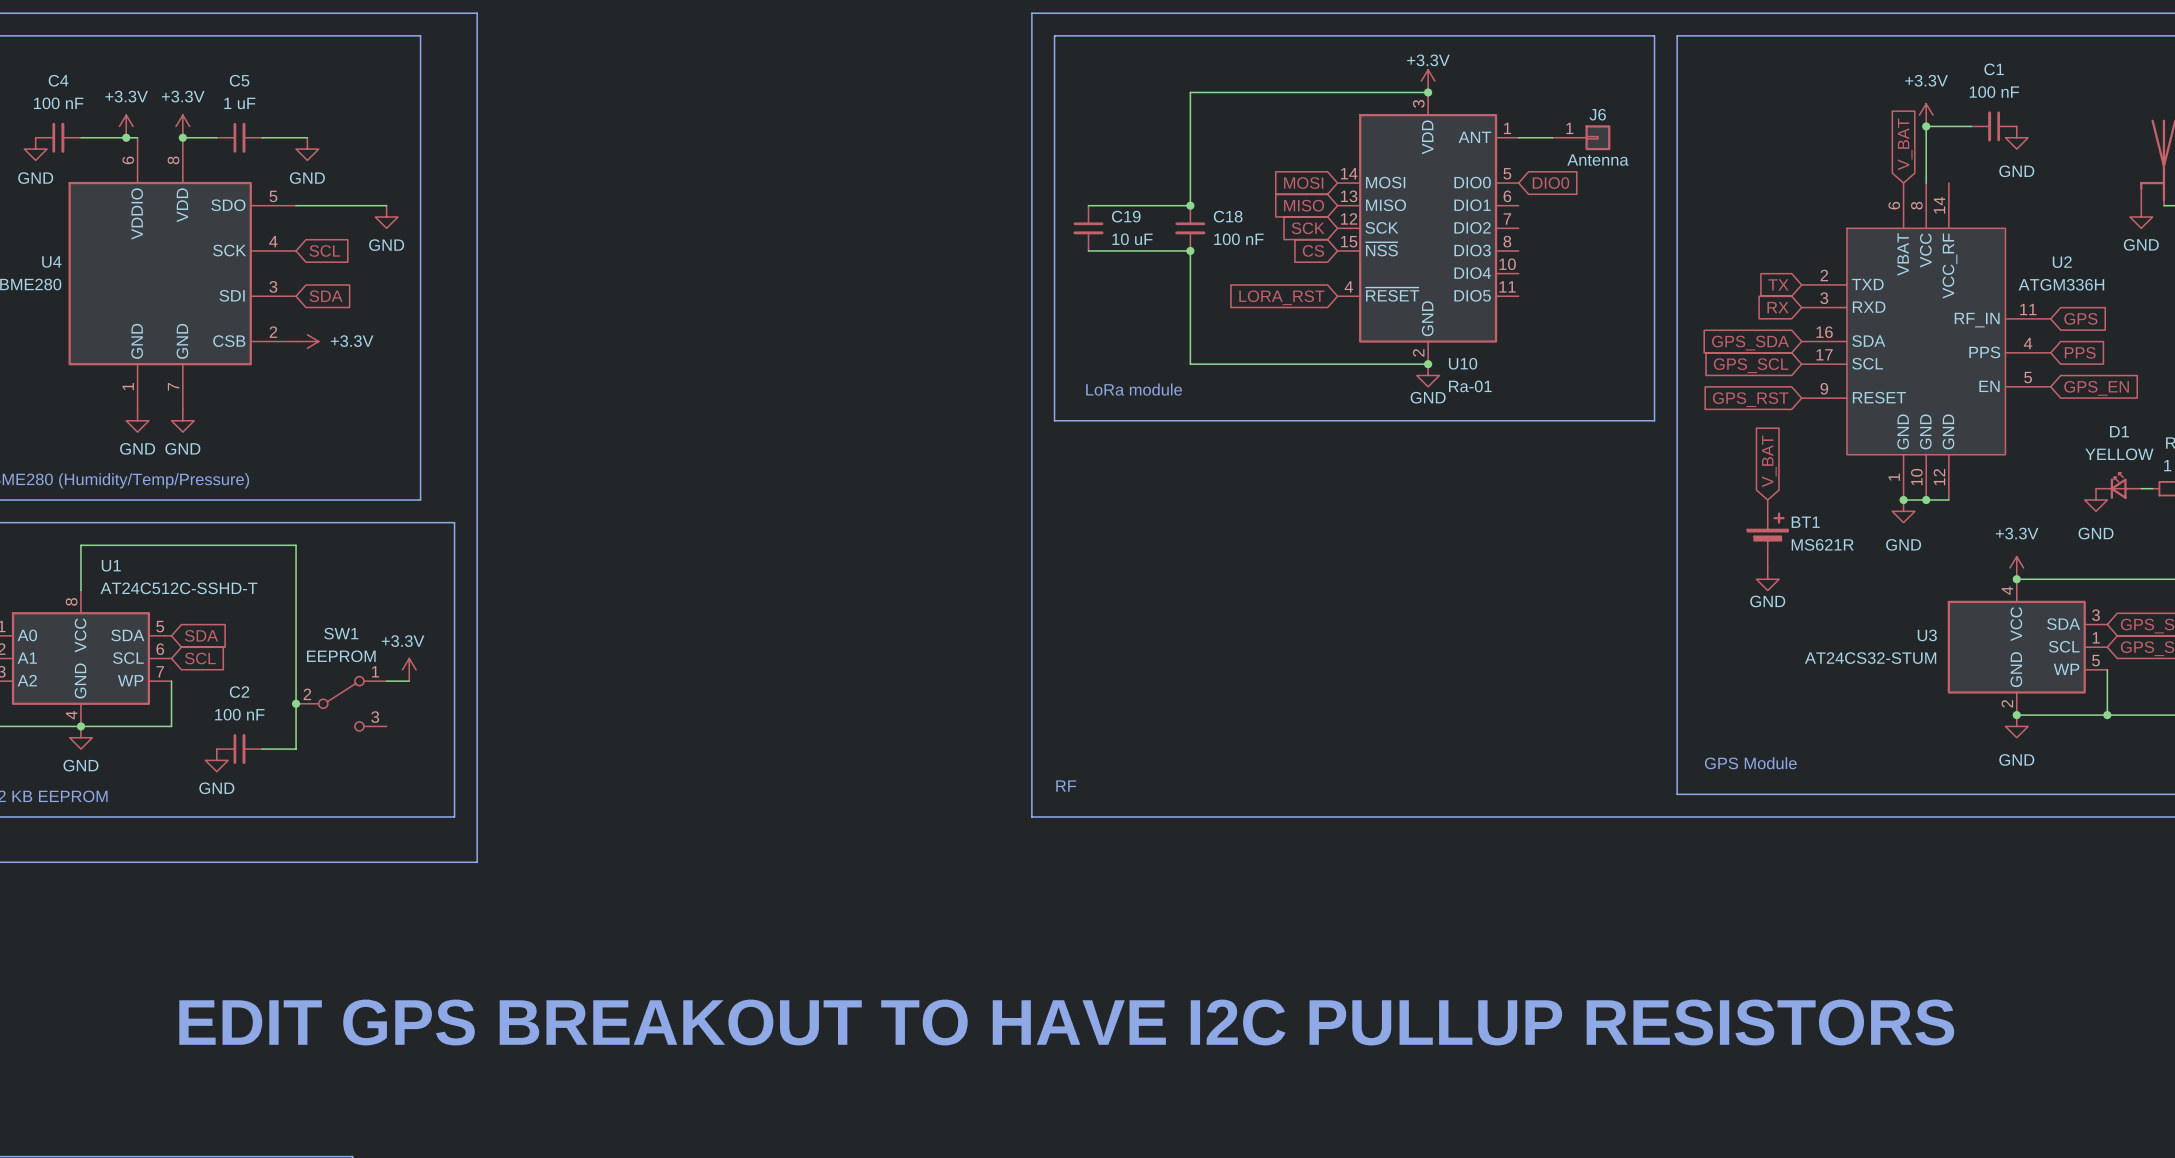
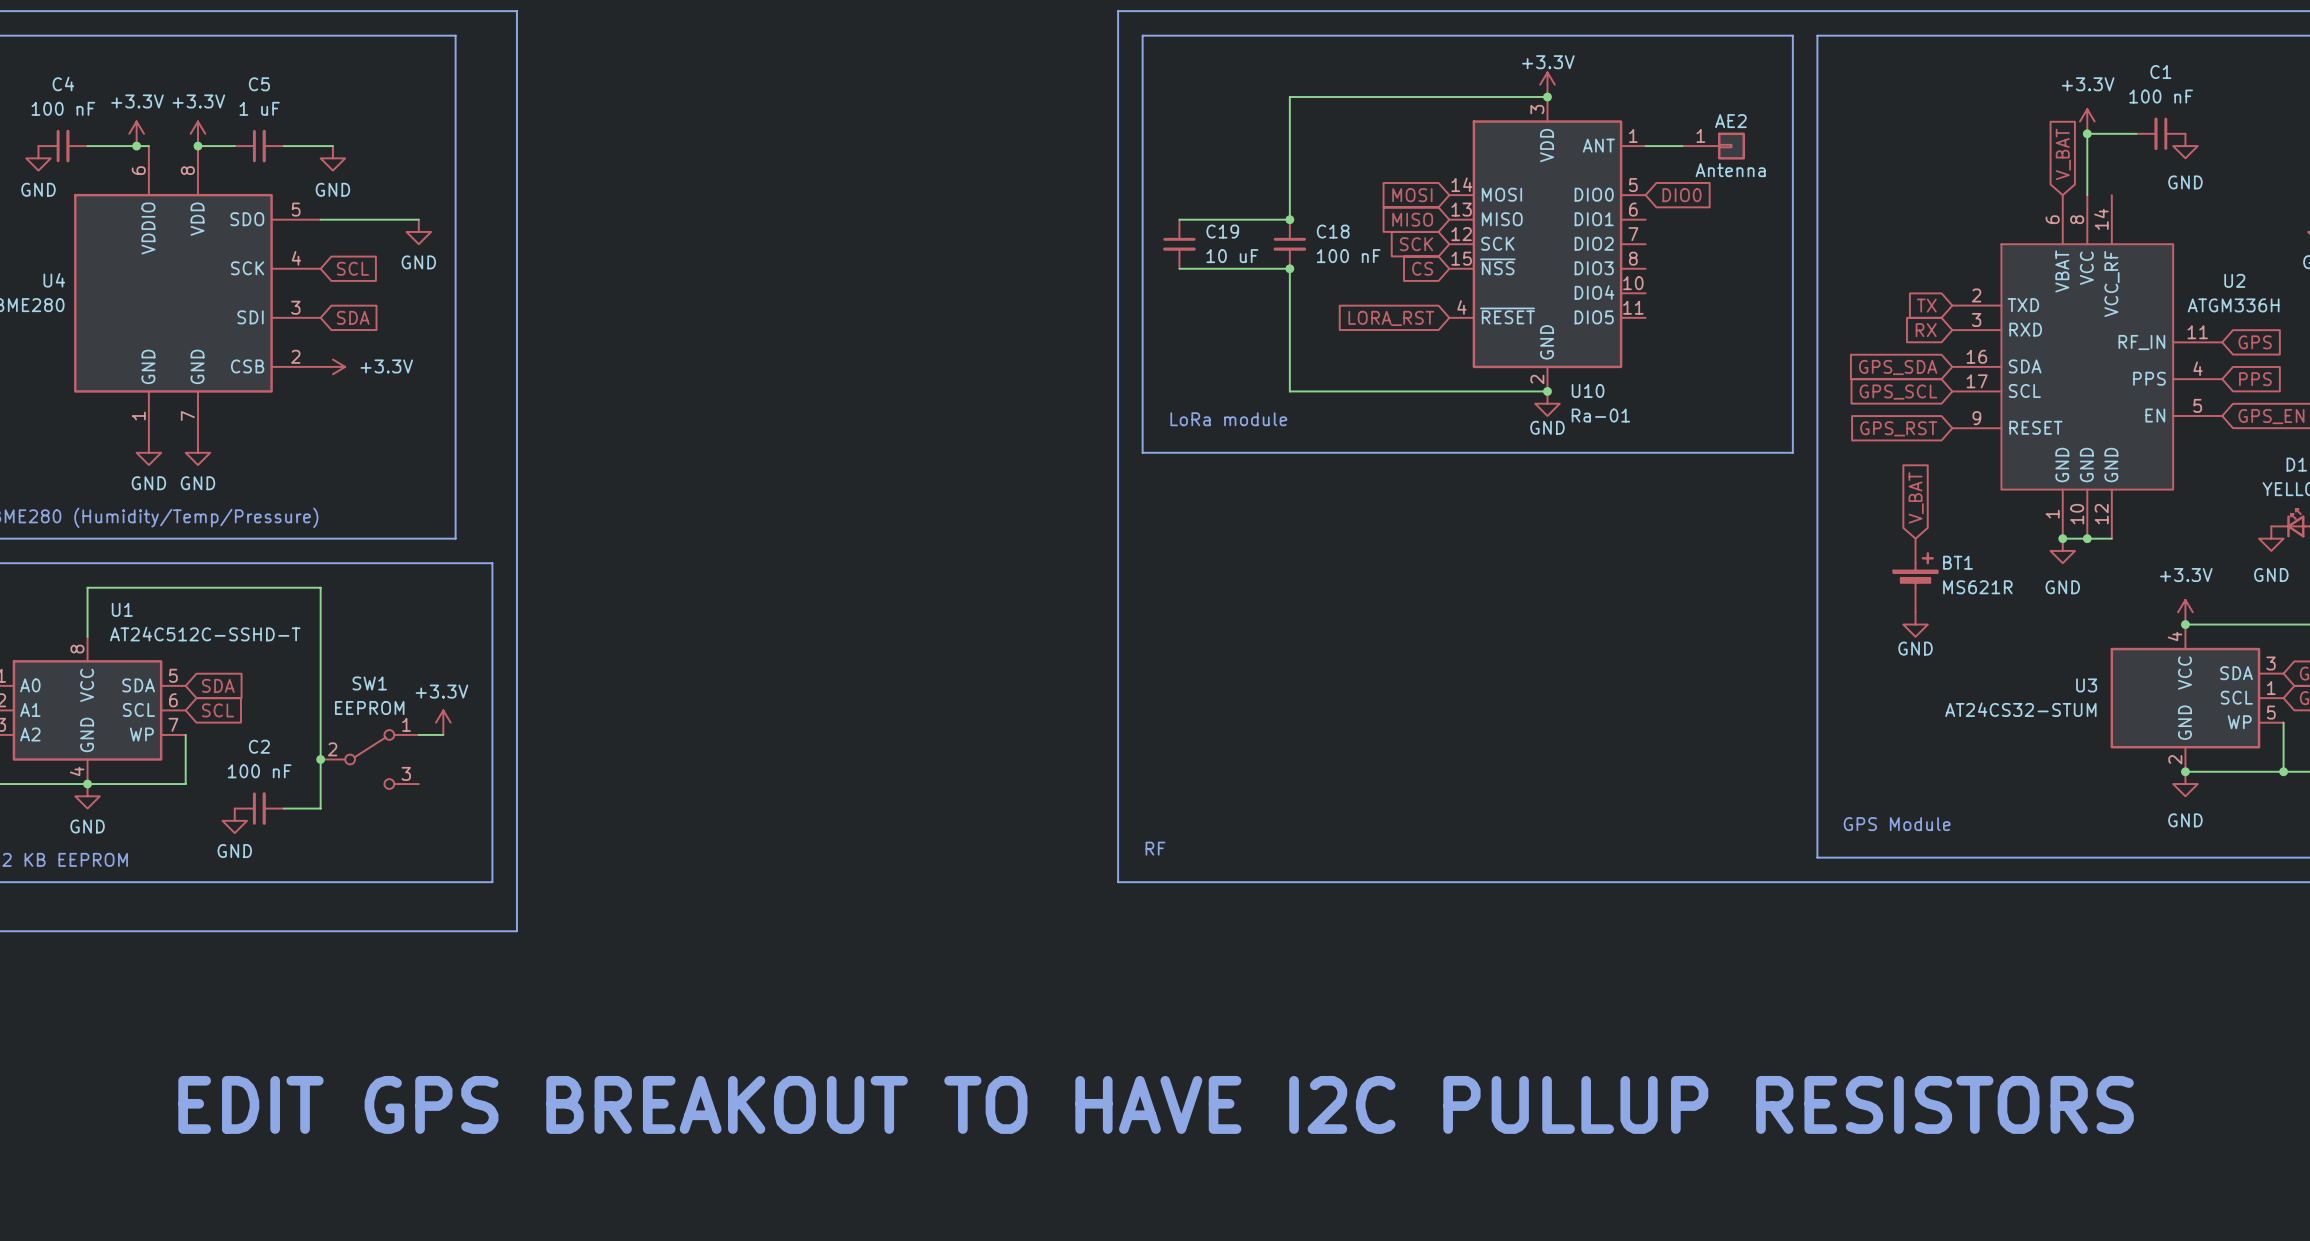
J6 name: J6 (1597, 114) -> AE2 (1730, 121)

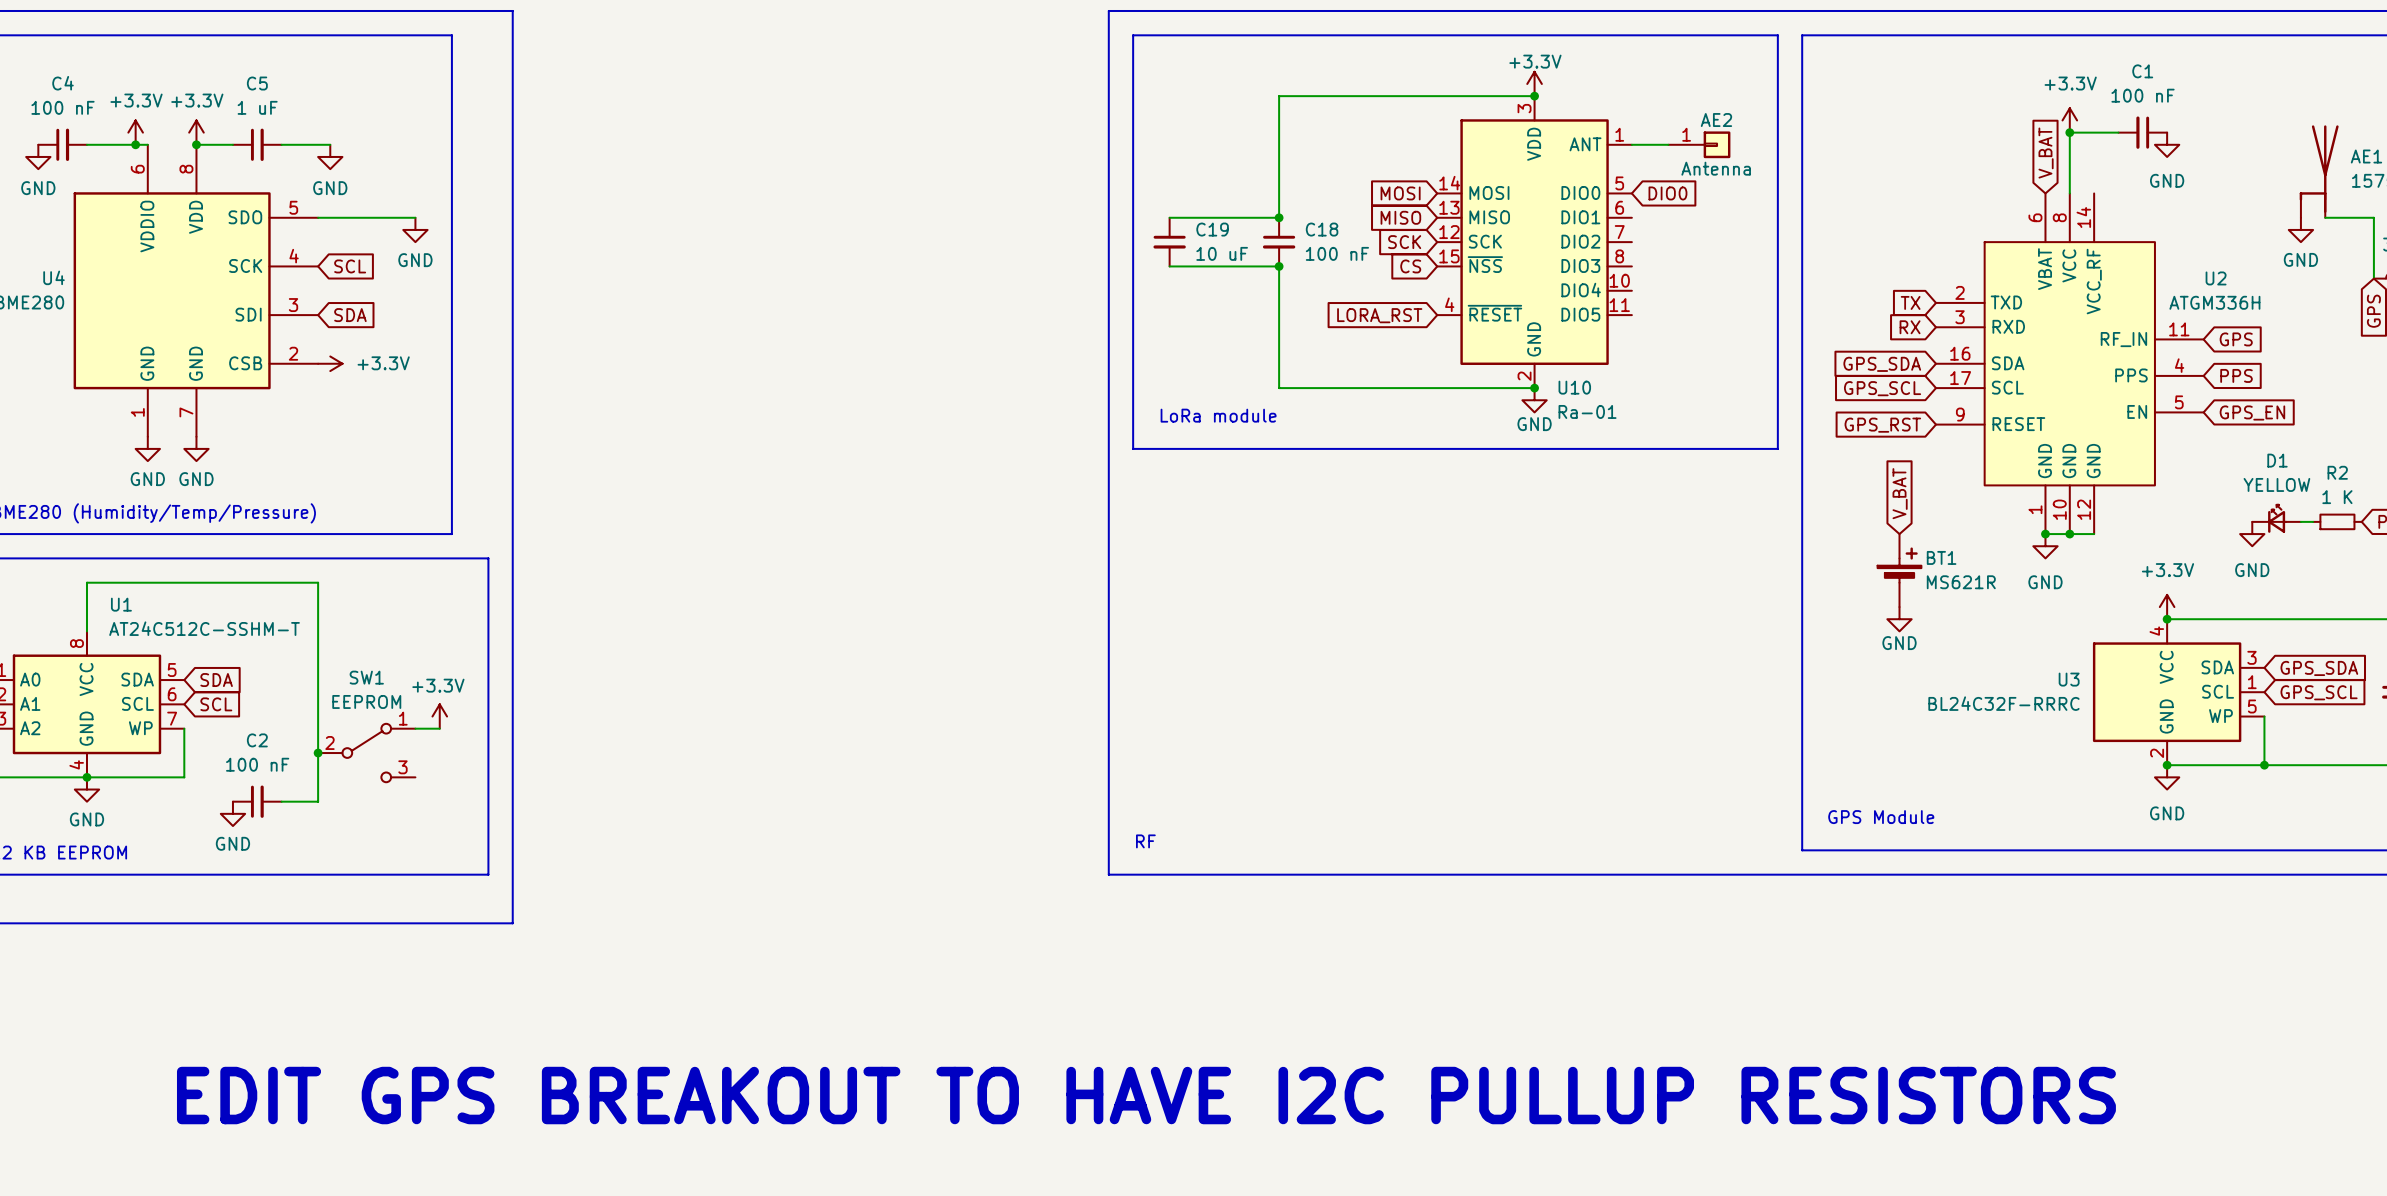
U1 value: AT24C512C-SSHD-T (205, 634) -> AT24C512C-SSHM-T (204, 628)
U3 value: AT24CS32-STUM (2020, 709) -> BL24C32F-RRRC (2003, 703)

